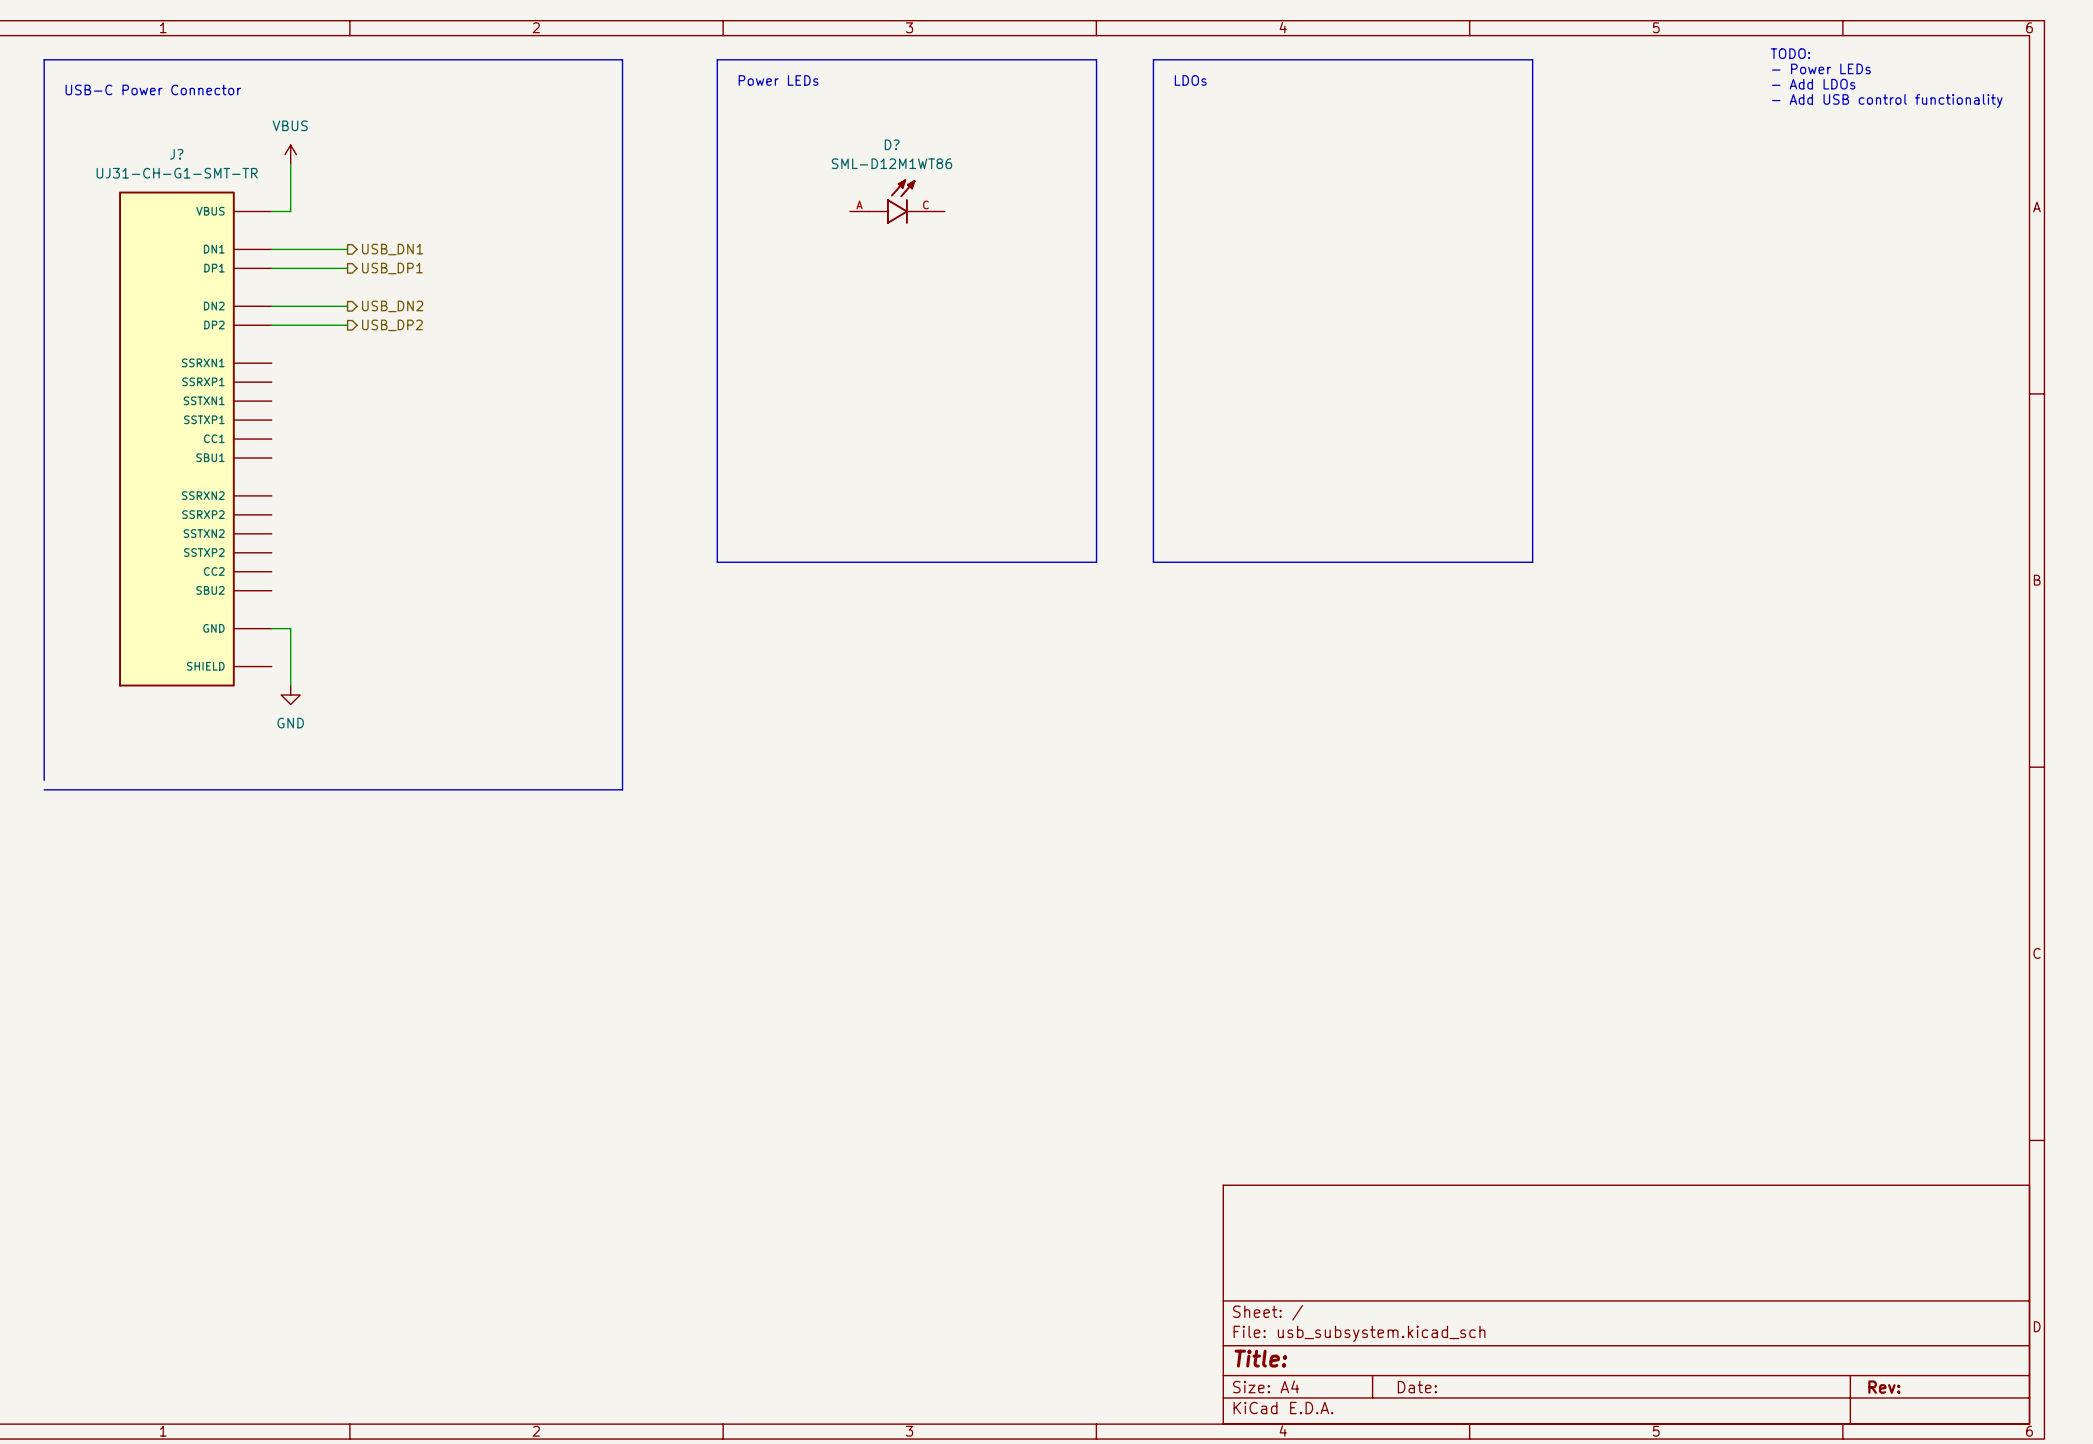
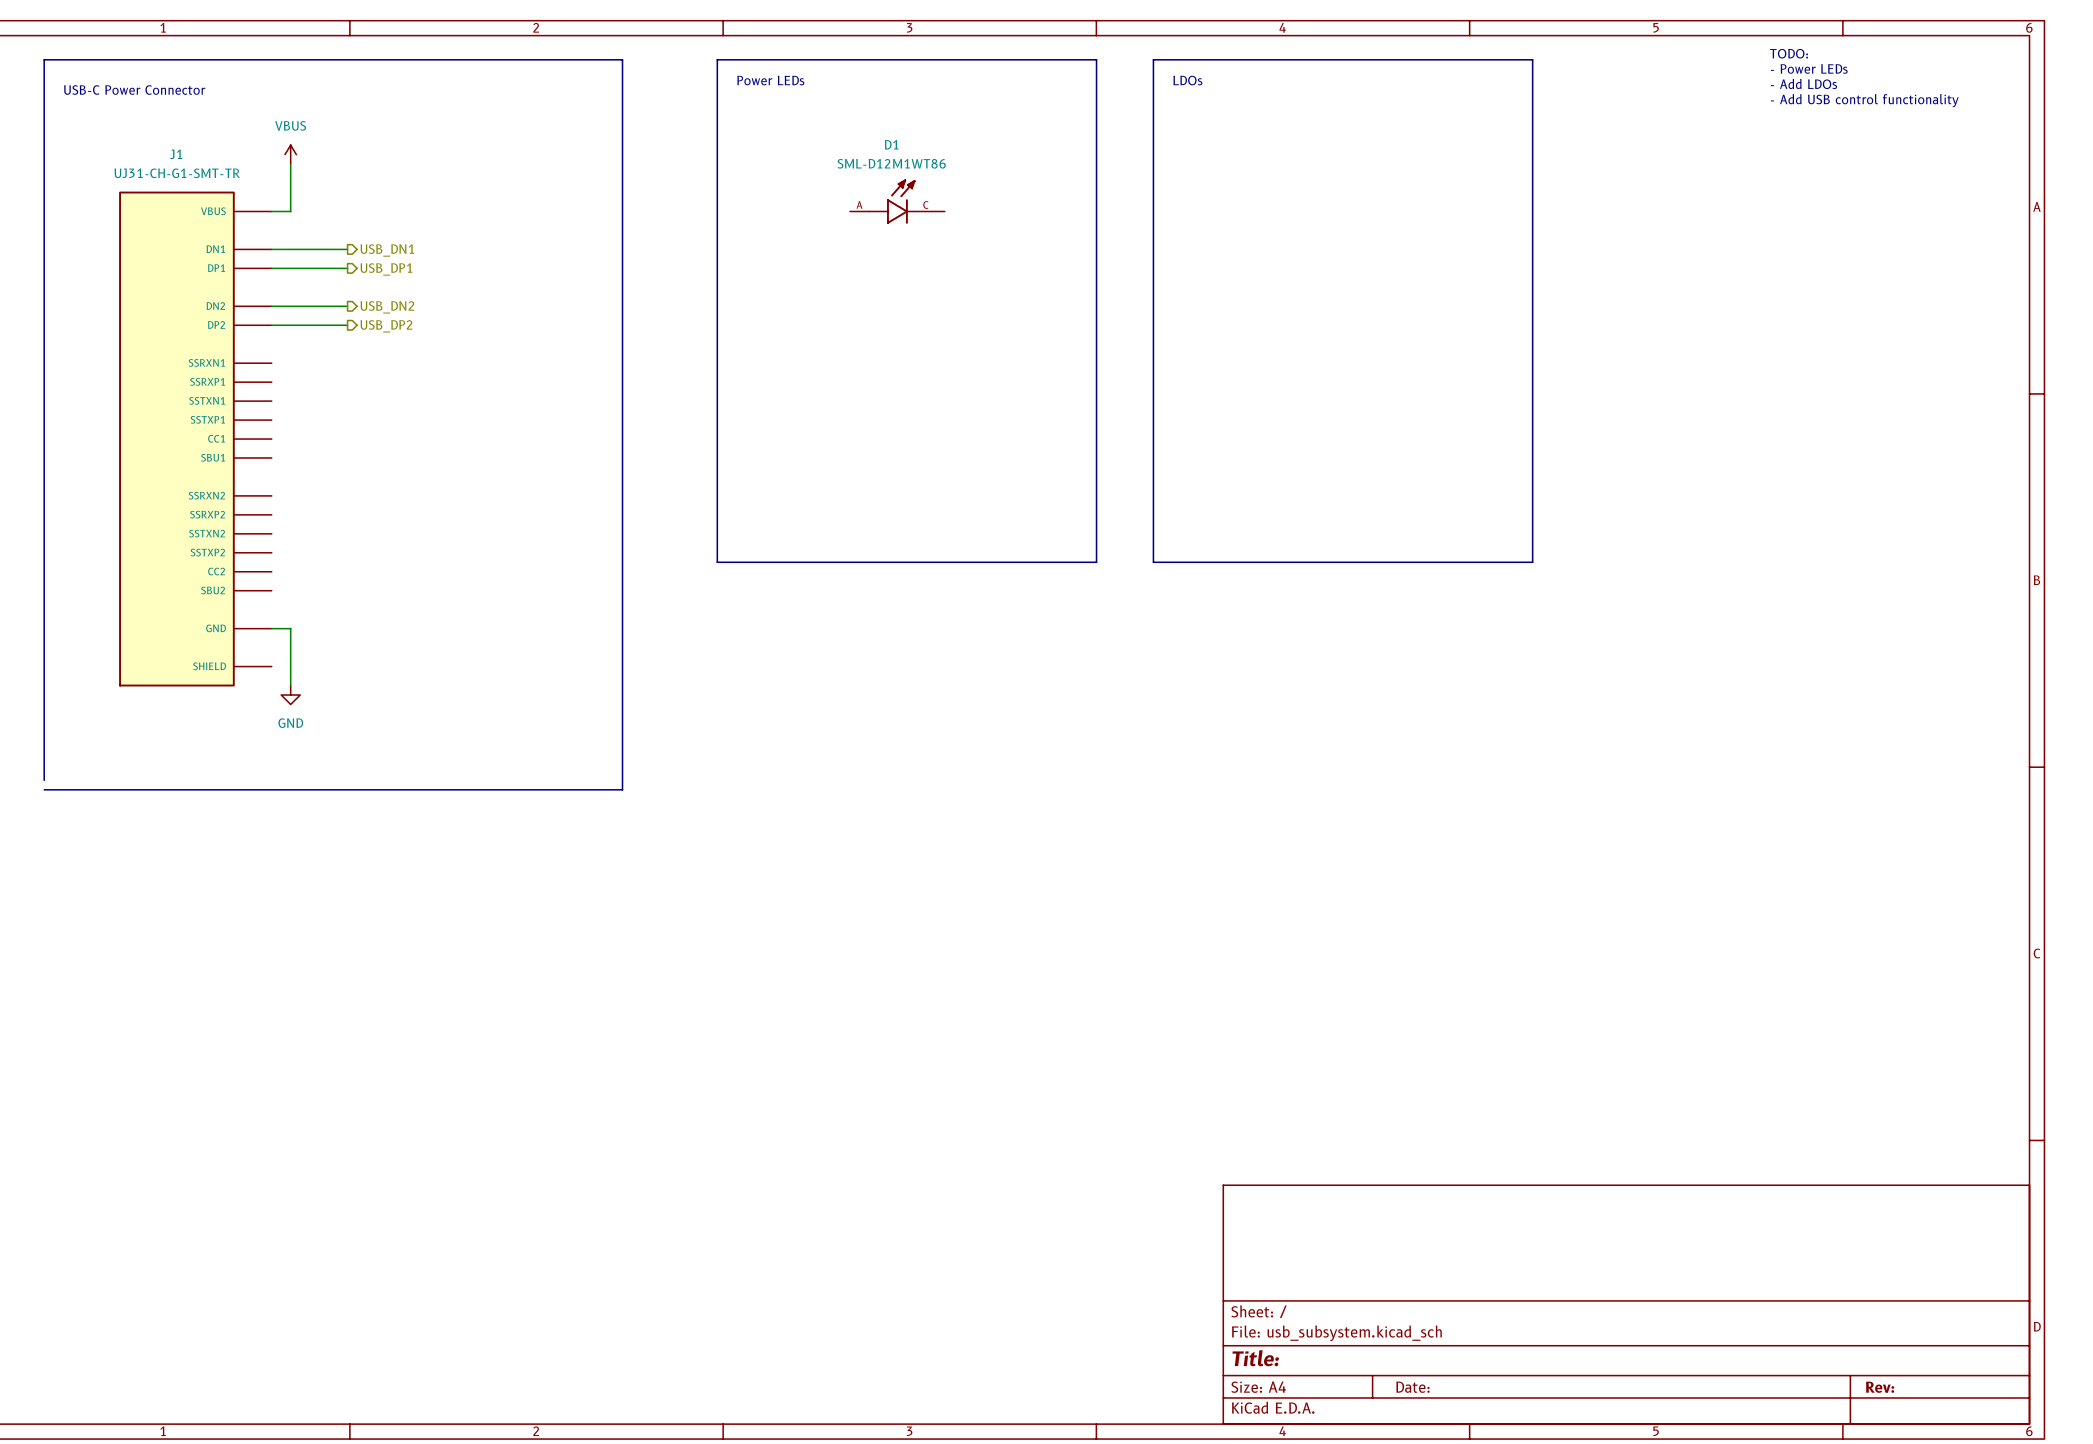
D? name: D? (892, 144) -> D1 (891, 144)
J? name: J? (176, 154) -> J1 (176, 154)

